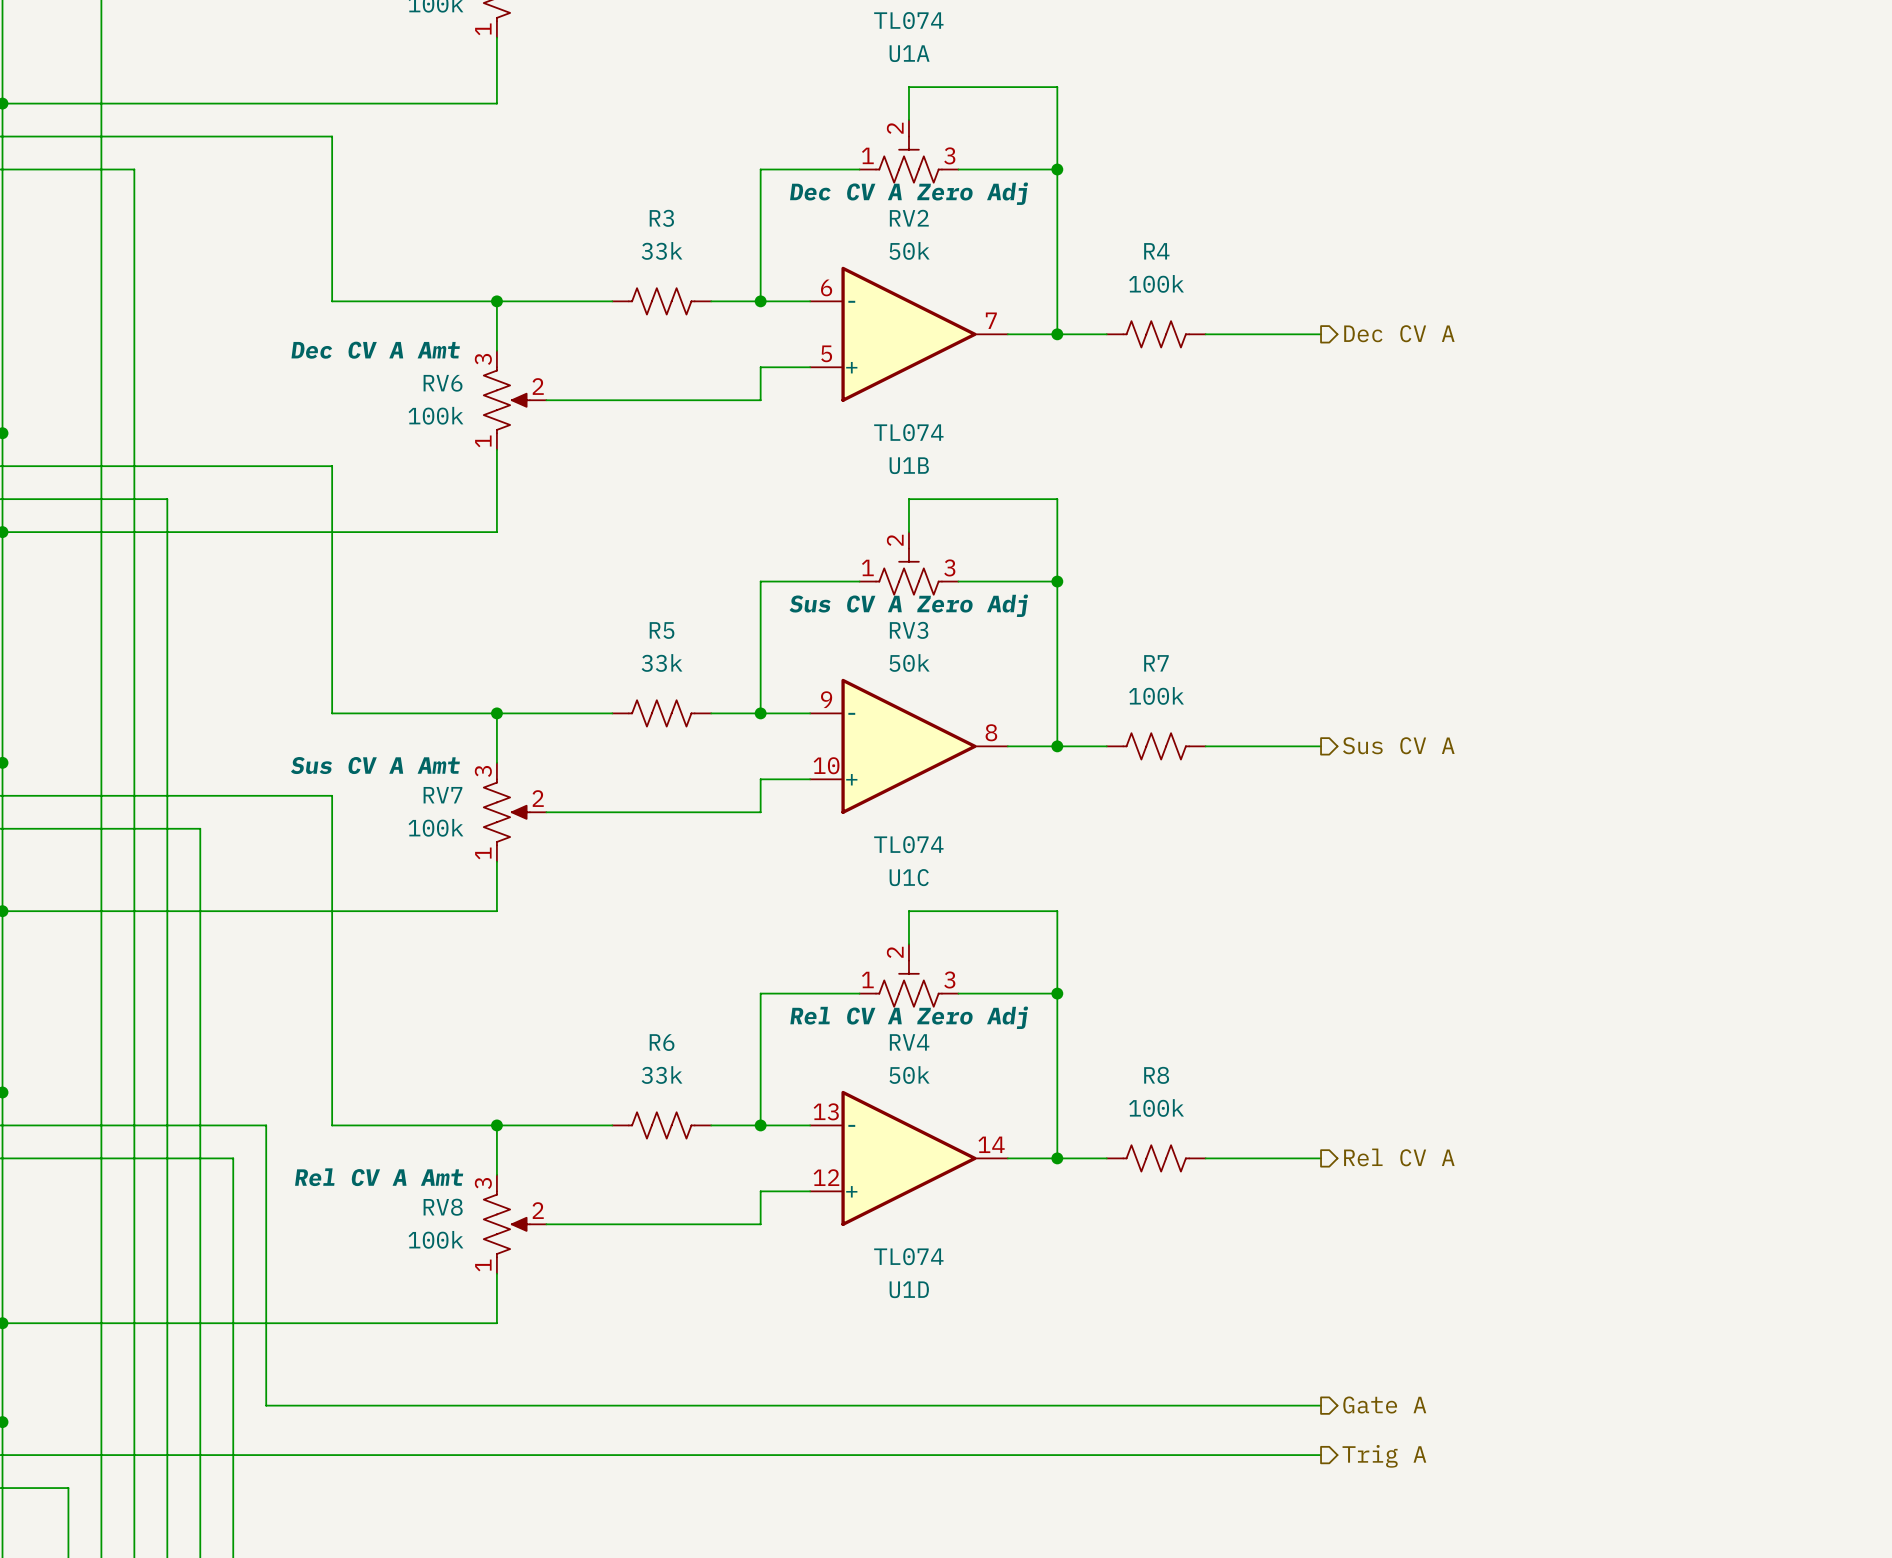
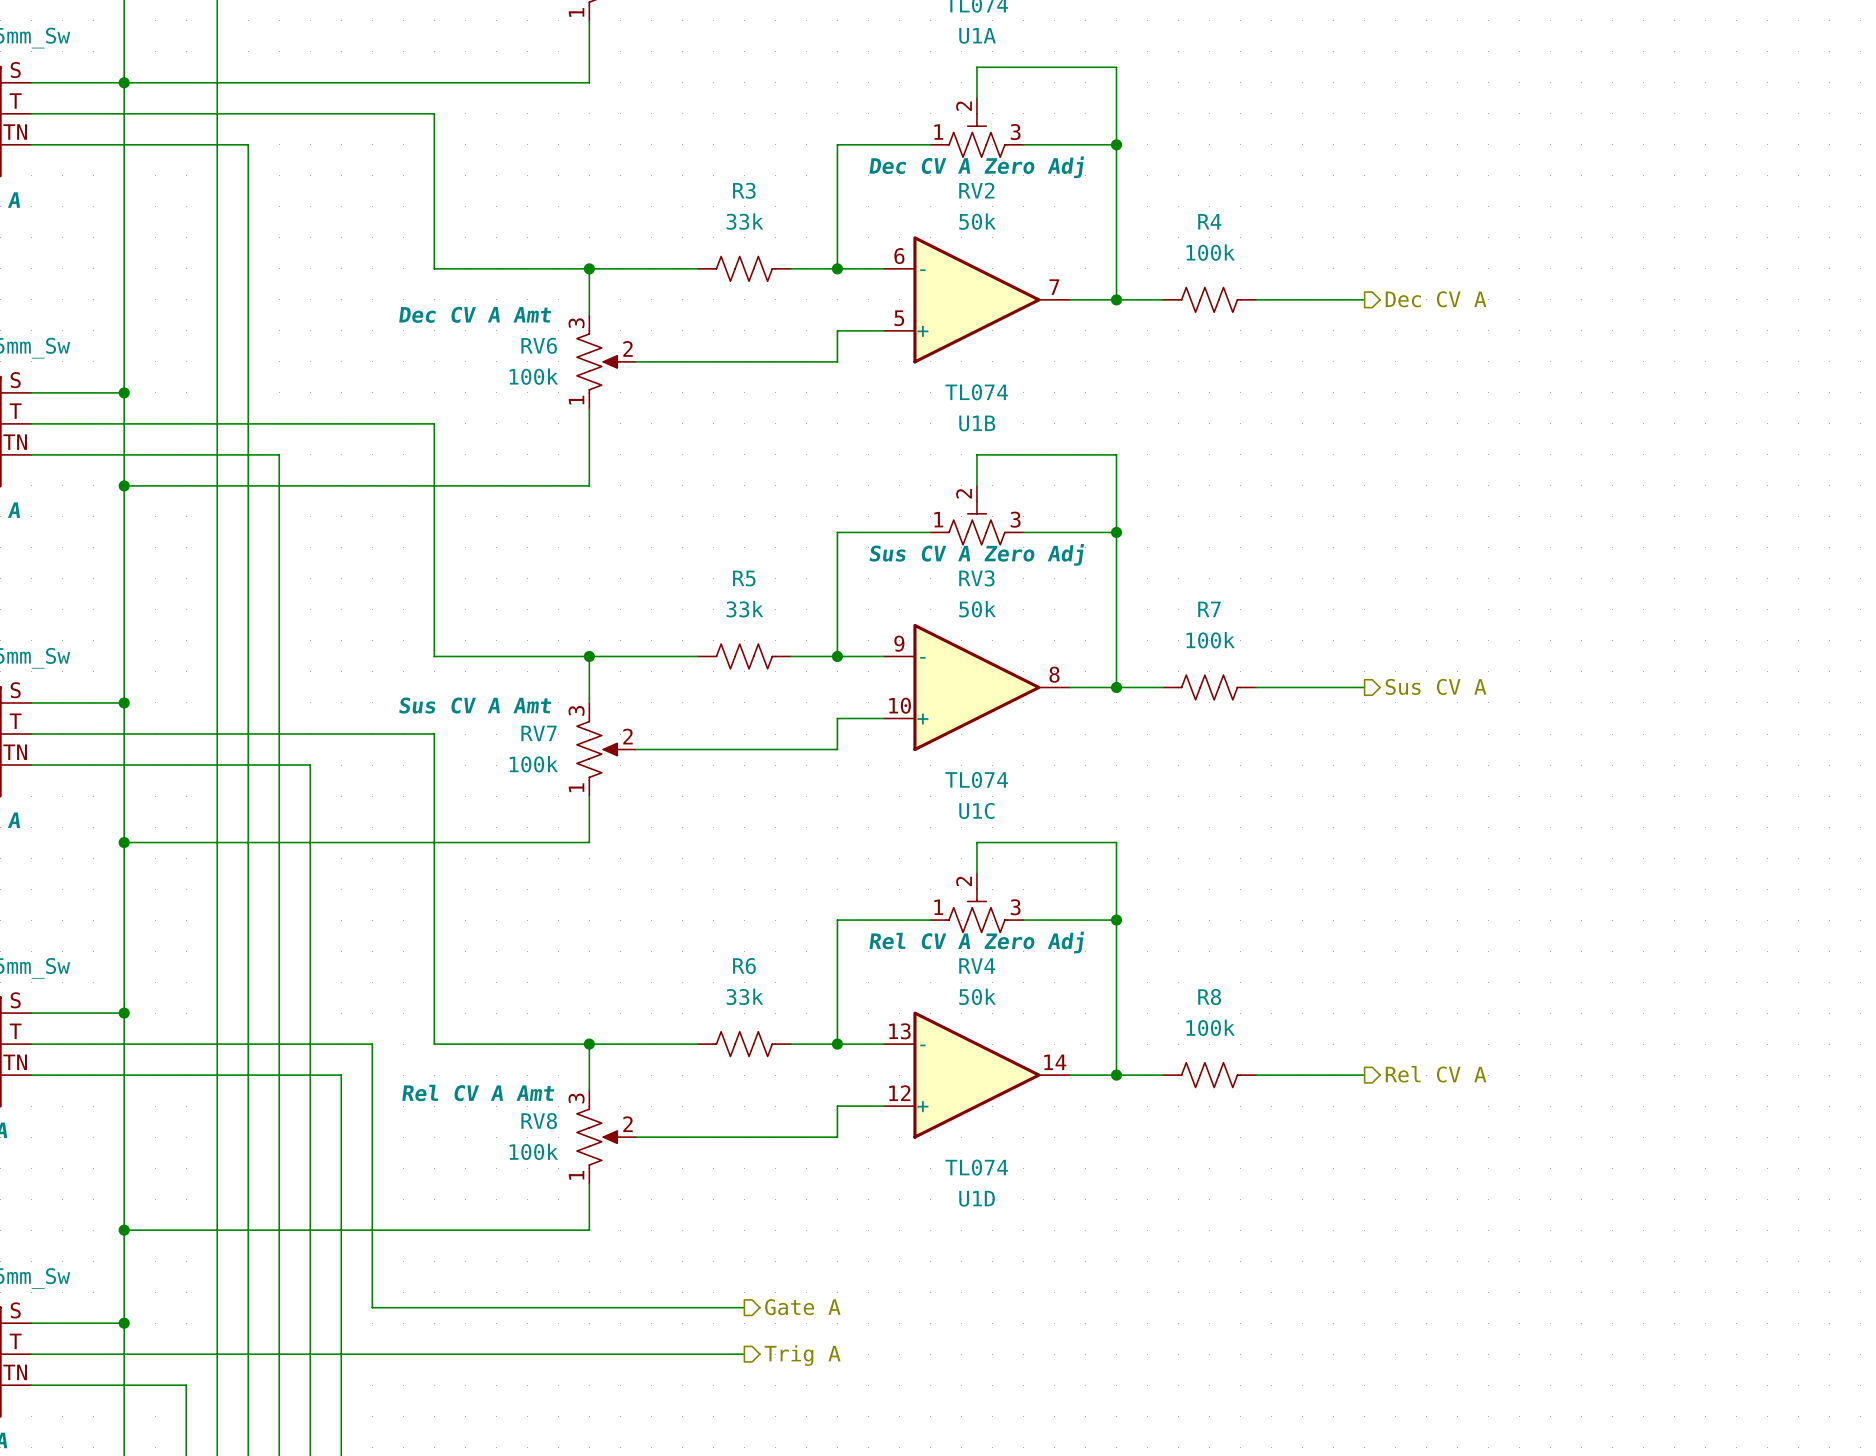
wire: (661, 1405) (1321, 1405) -> none
hierarchical label: none -> Gate A (802, 1307)
hierarchical label: Gate A (1384, 1405) -> none
wire: (661, 1455) (1321, 1455) -> none
hierarchical label: none -> Trig A (802, 1355)
hierarchical label: Trig A (1384, 1456) -> none

